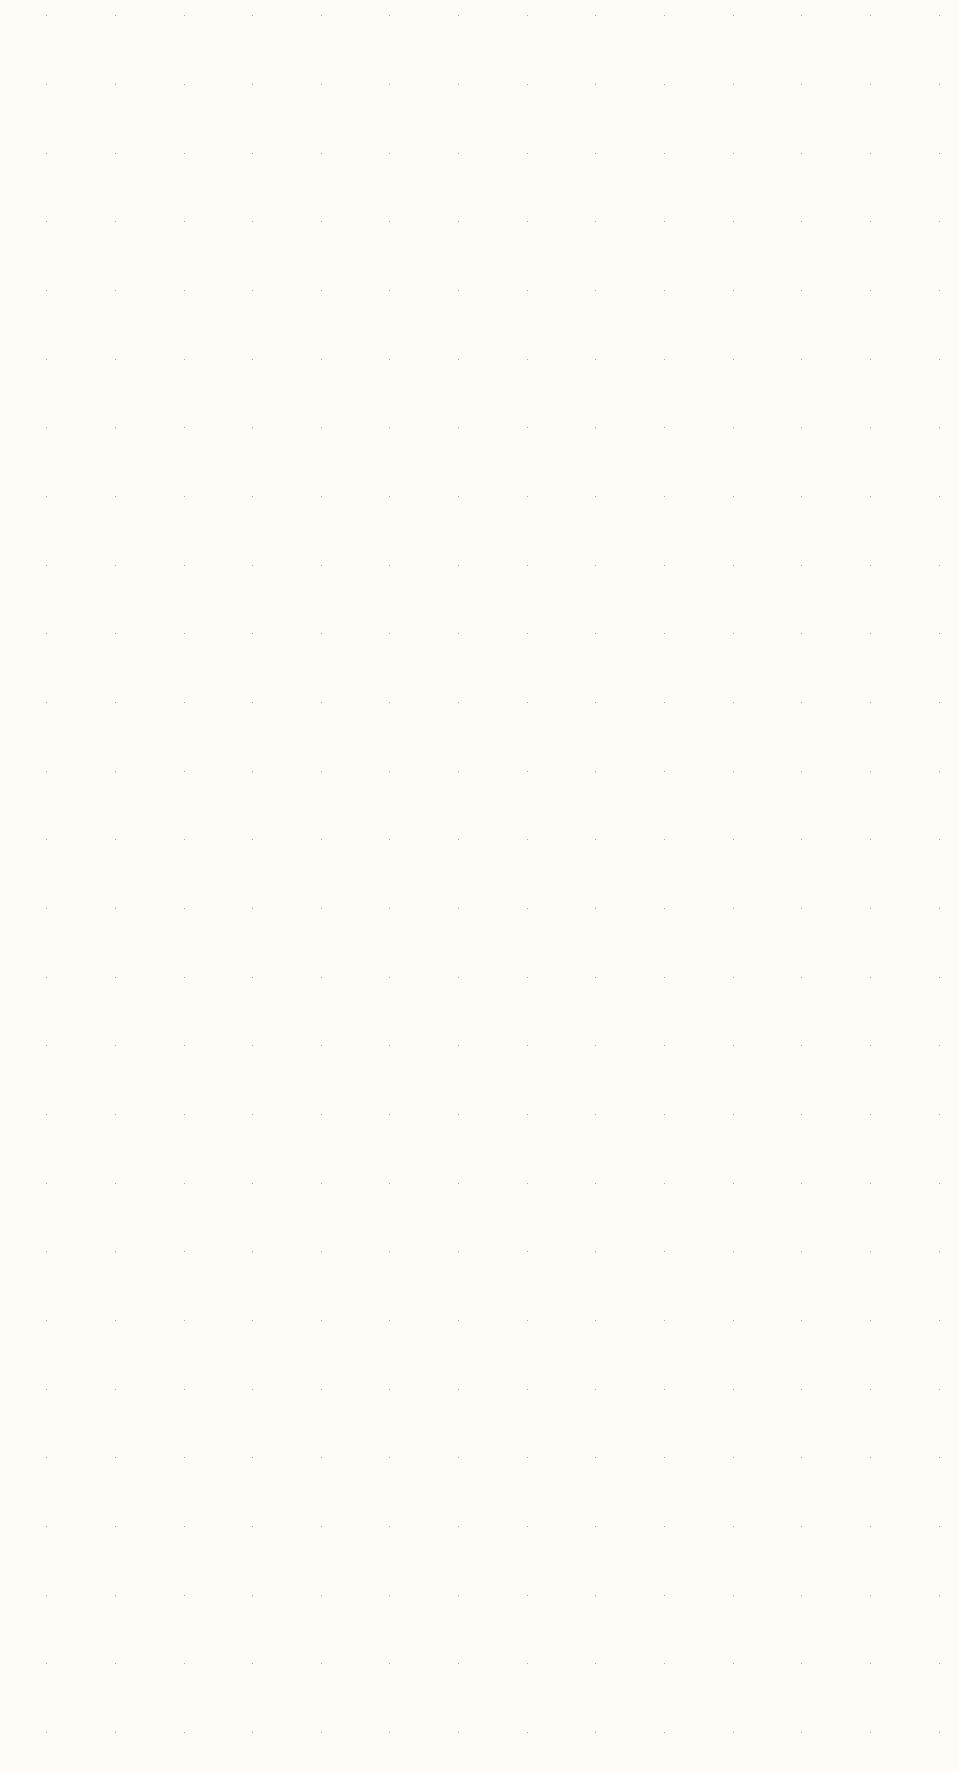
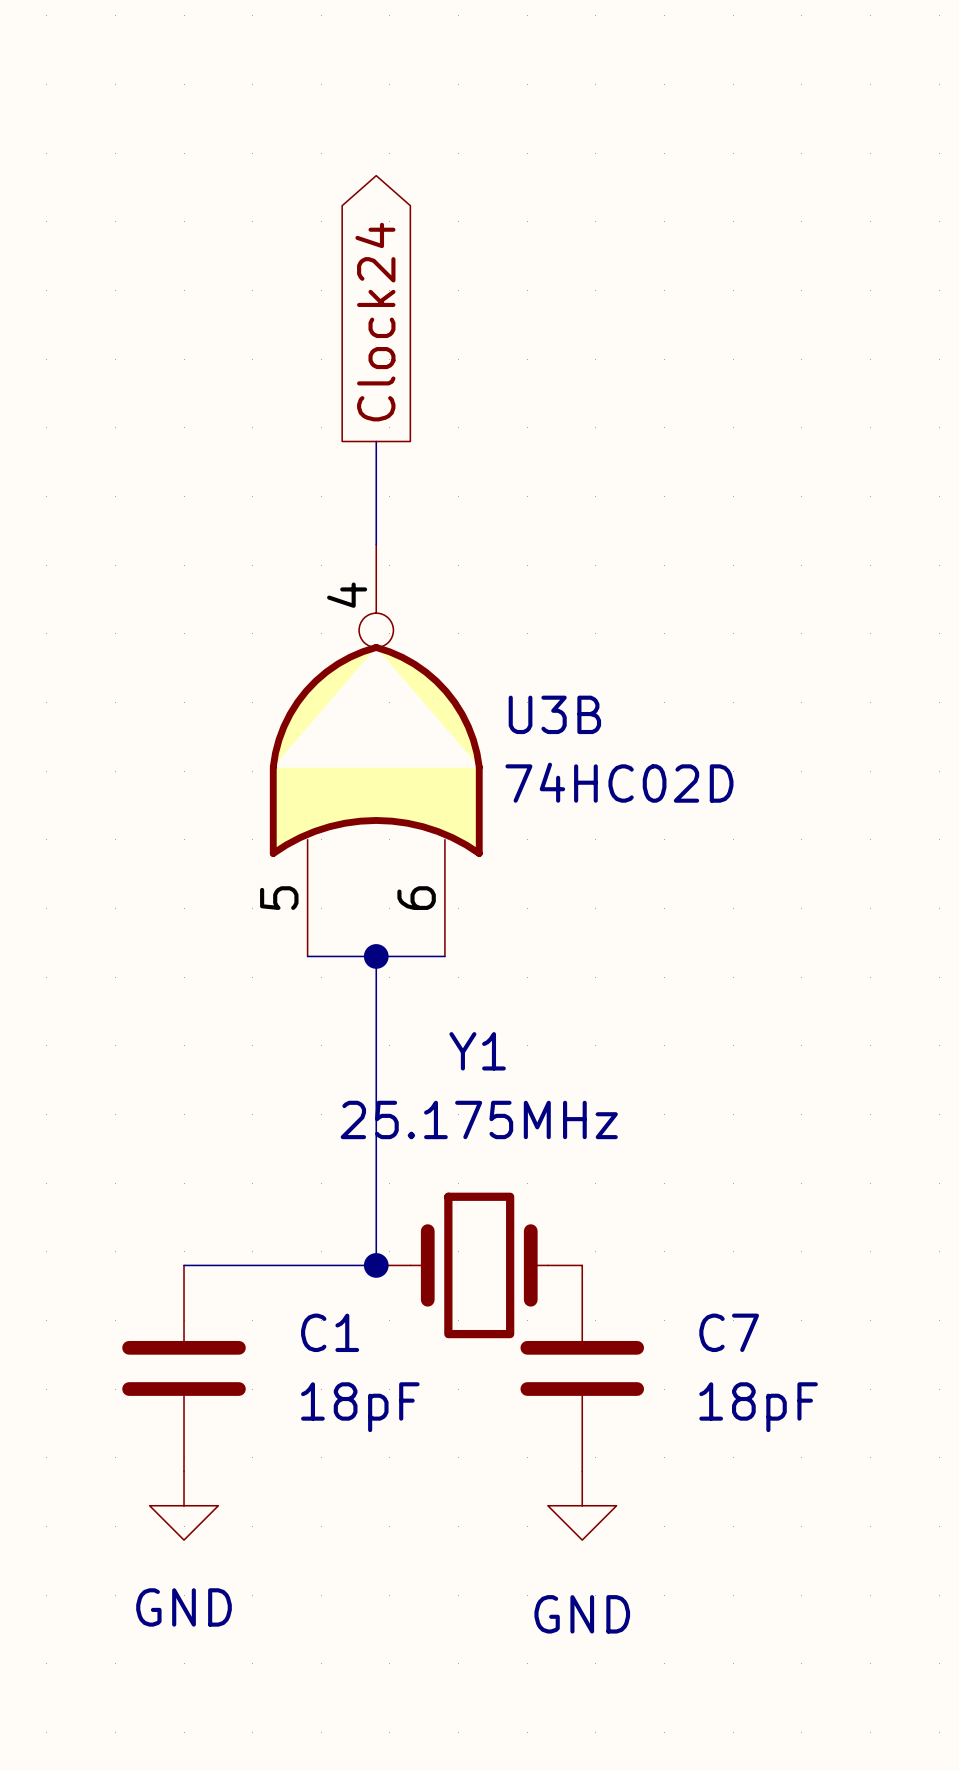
global label: none -> Clock24 (375, 322)
wire: none -> (376, 441) (376, 544)
U3B: none -> 74HC02D (376, 750)
wire: none -> (307, 956) (444, 956)
wire: none -> (376, 956) (376, 1265) (184, 1265)
junction: none -> (376, 956)
junction: none -> (376, 1265)
Y1: none -> 25.175MHz (479, 1265)
C1: none -> 18pF (184, 1368)
C7: none -> 18pF (582, 1368)
power symbol: none -> GND (184, 1505)
power symbol: none -> GND (582, 1505)

